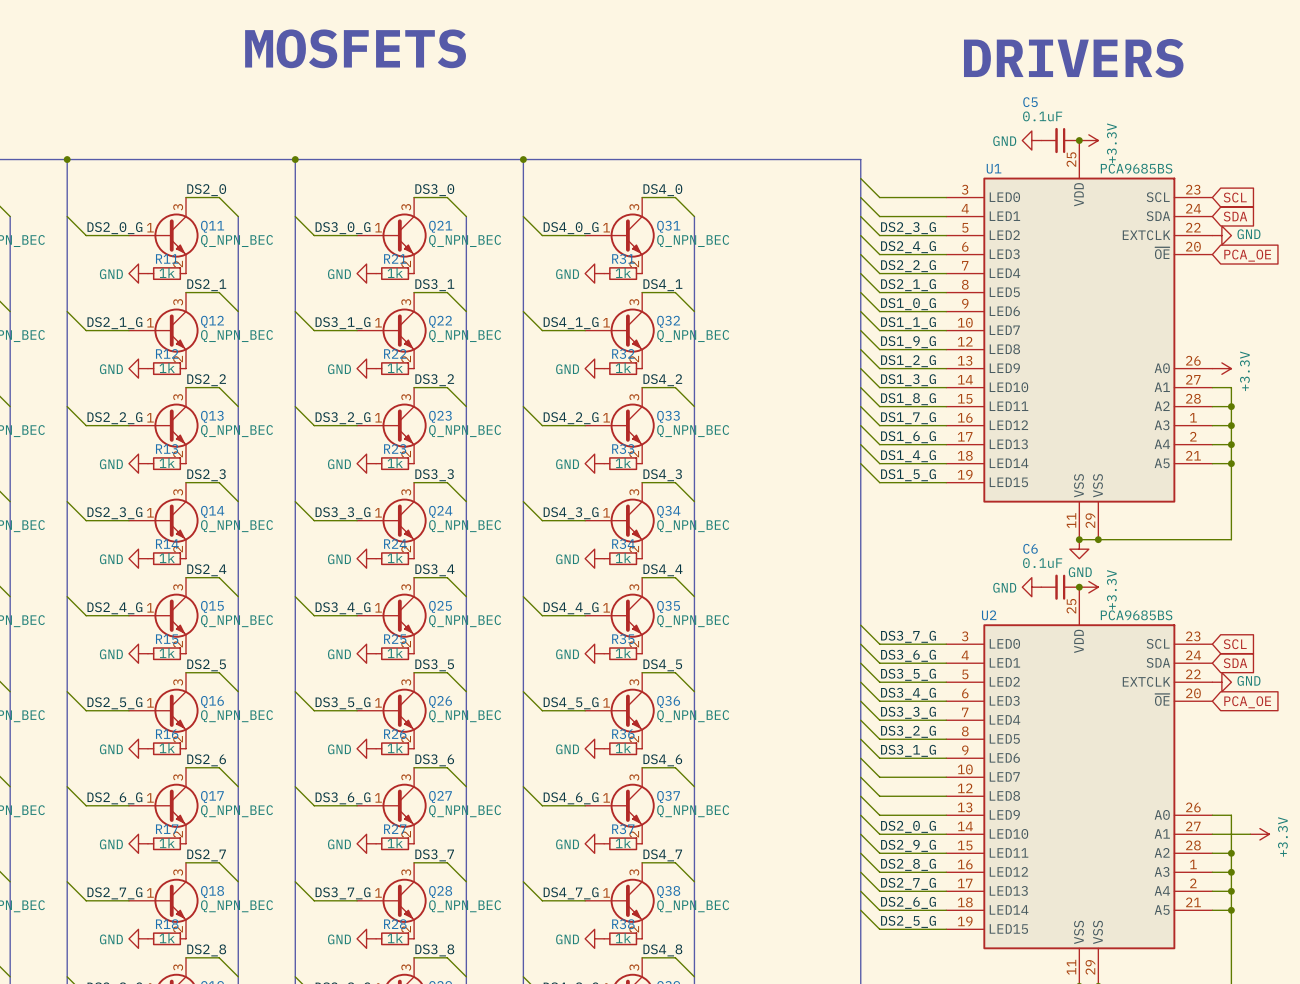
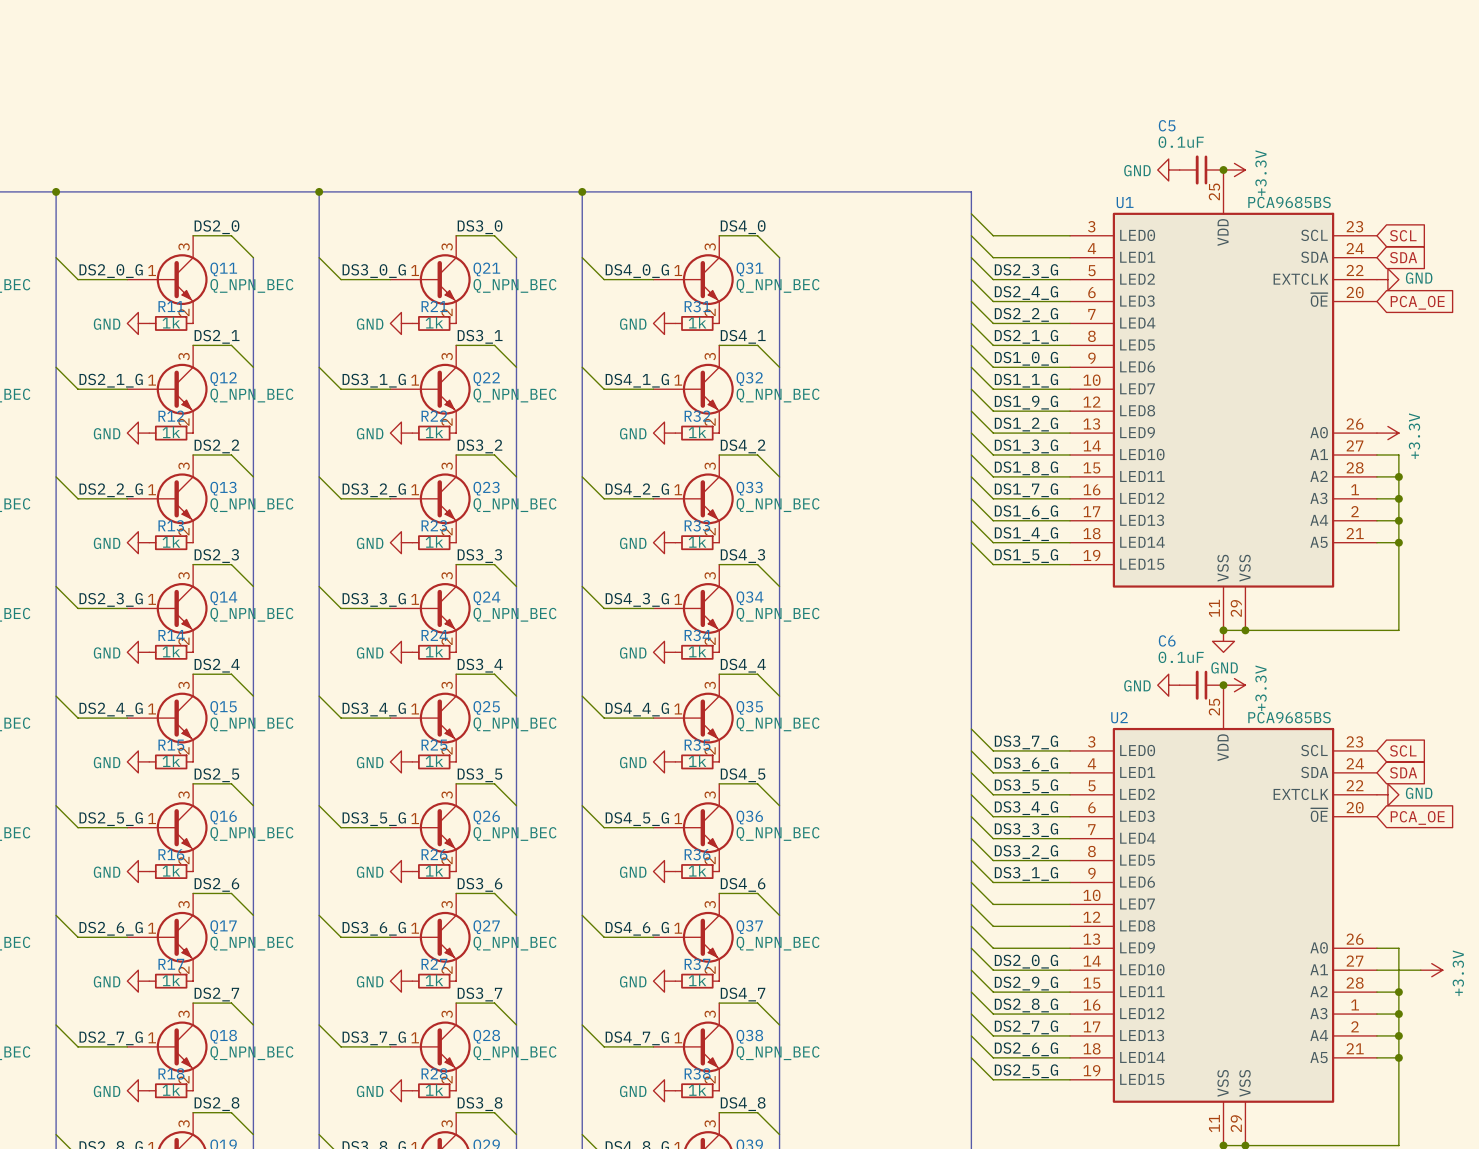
text: MOSFETS (355, 48) -> none
text: DRIVERS (1073, 58) -> none

